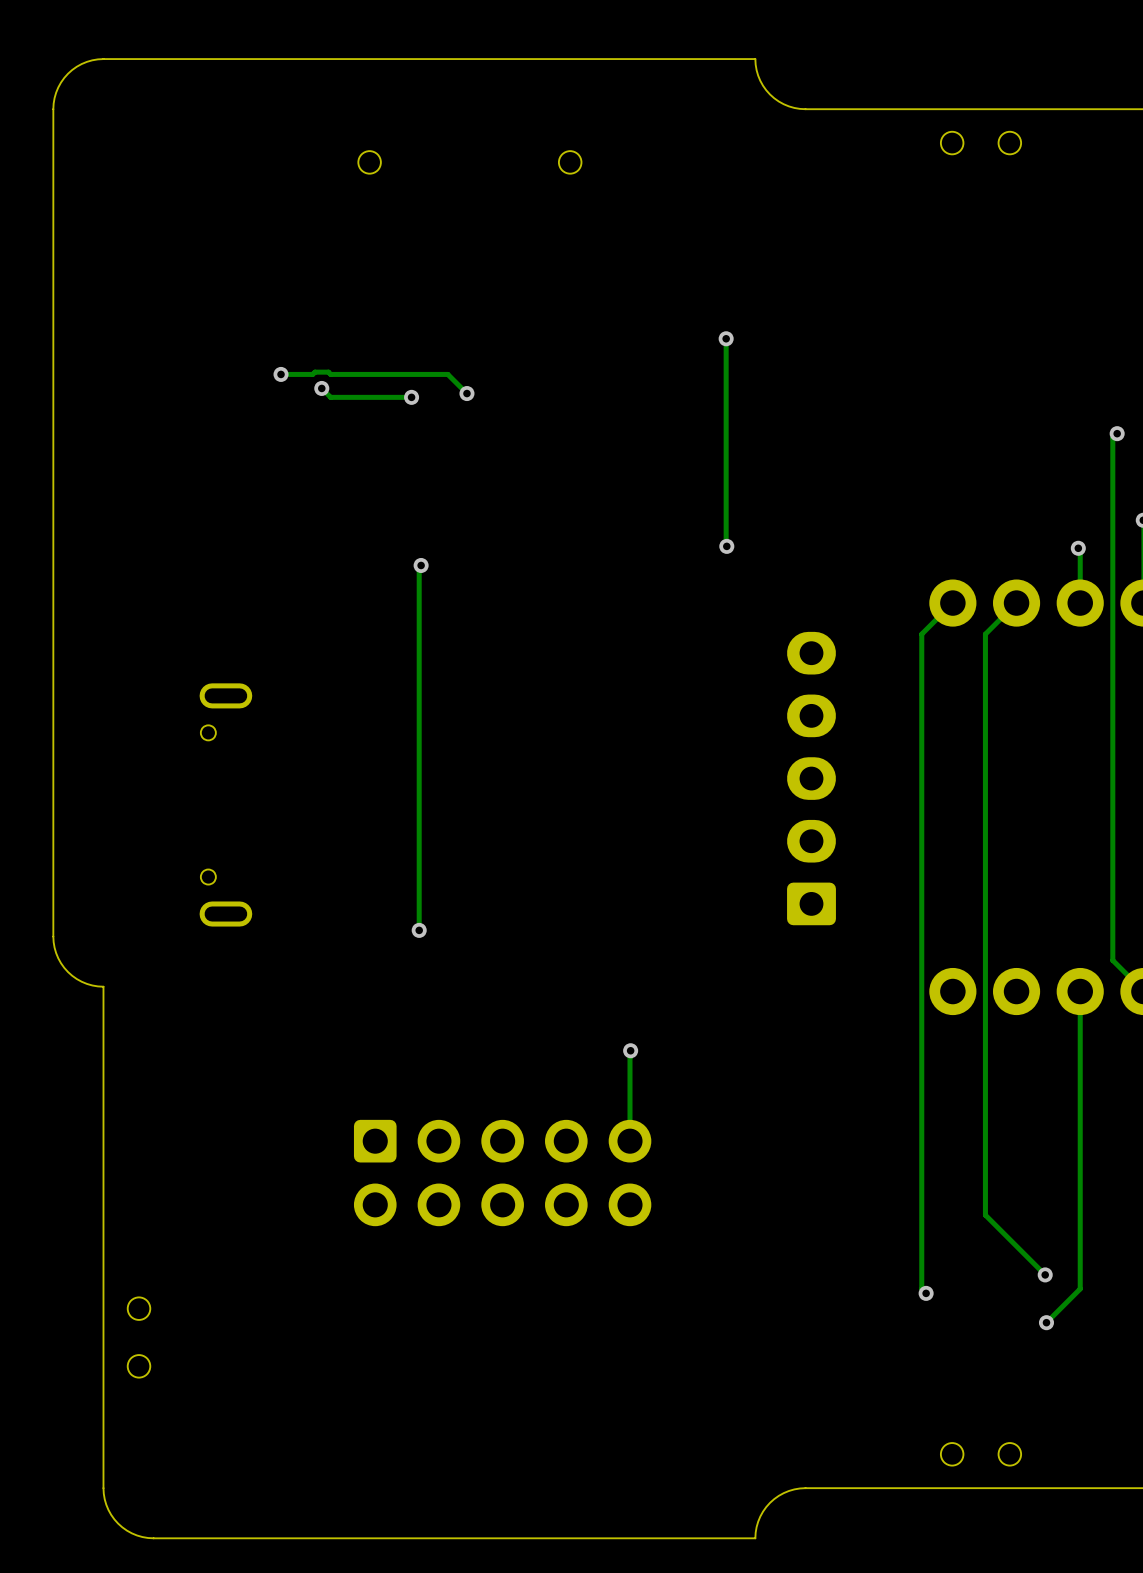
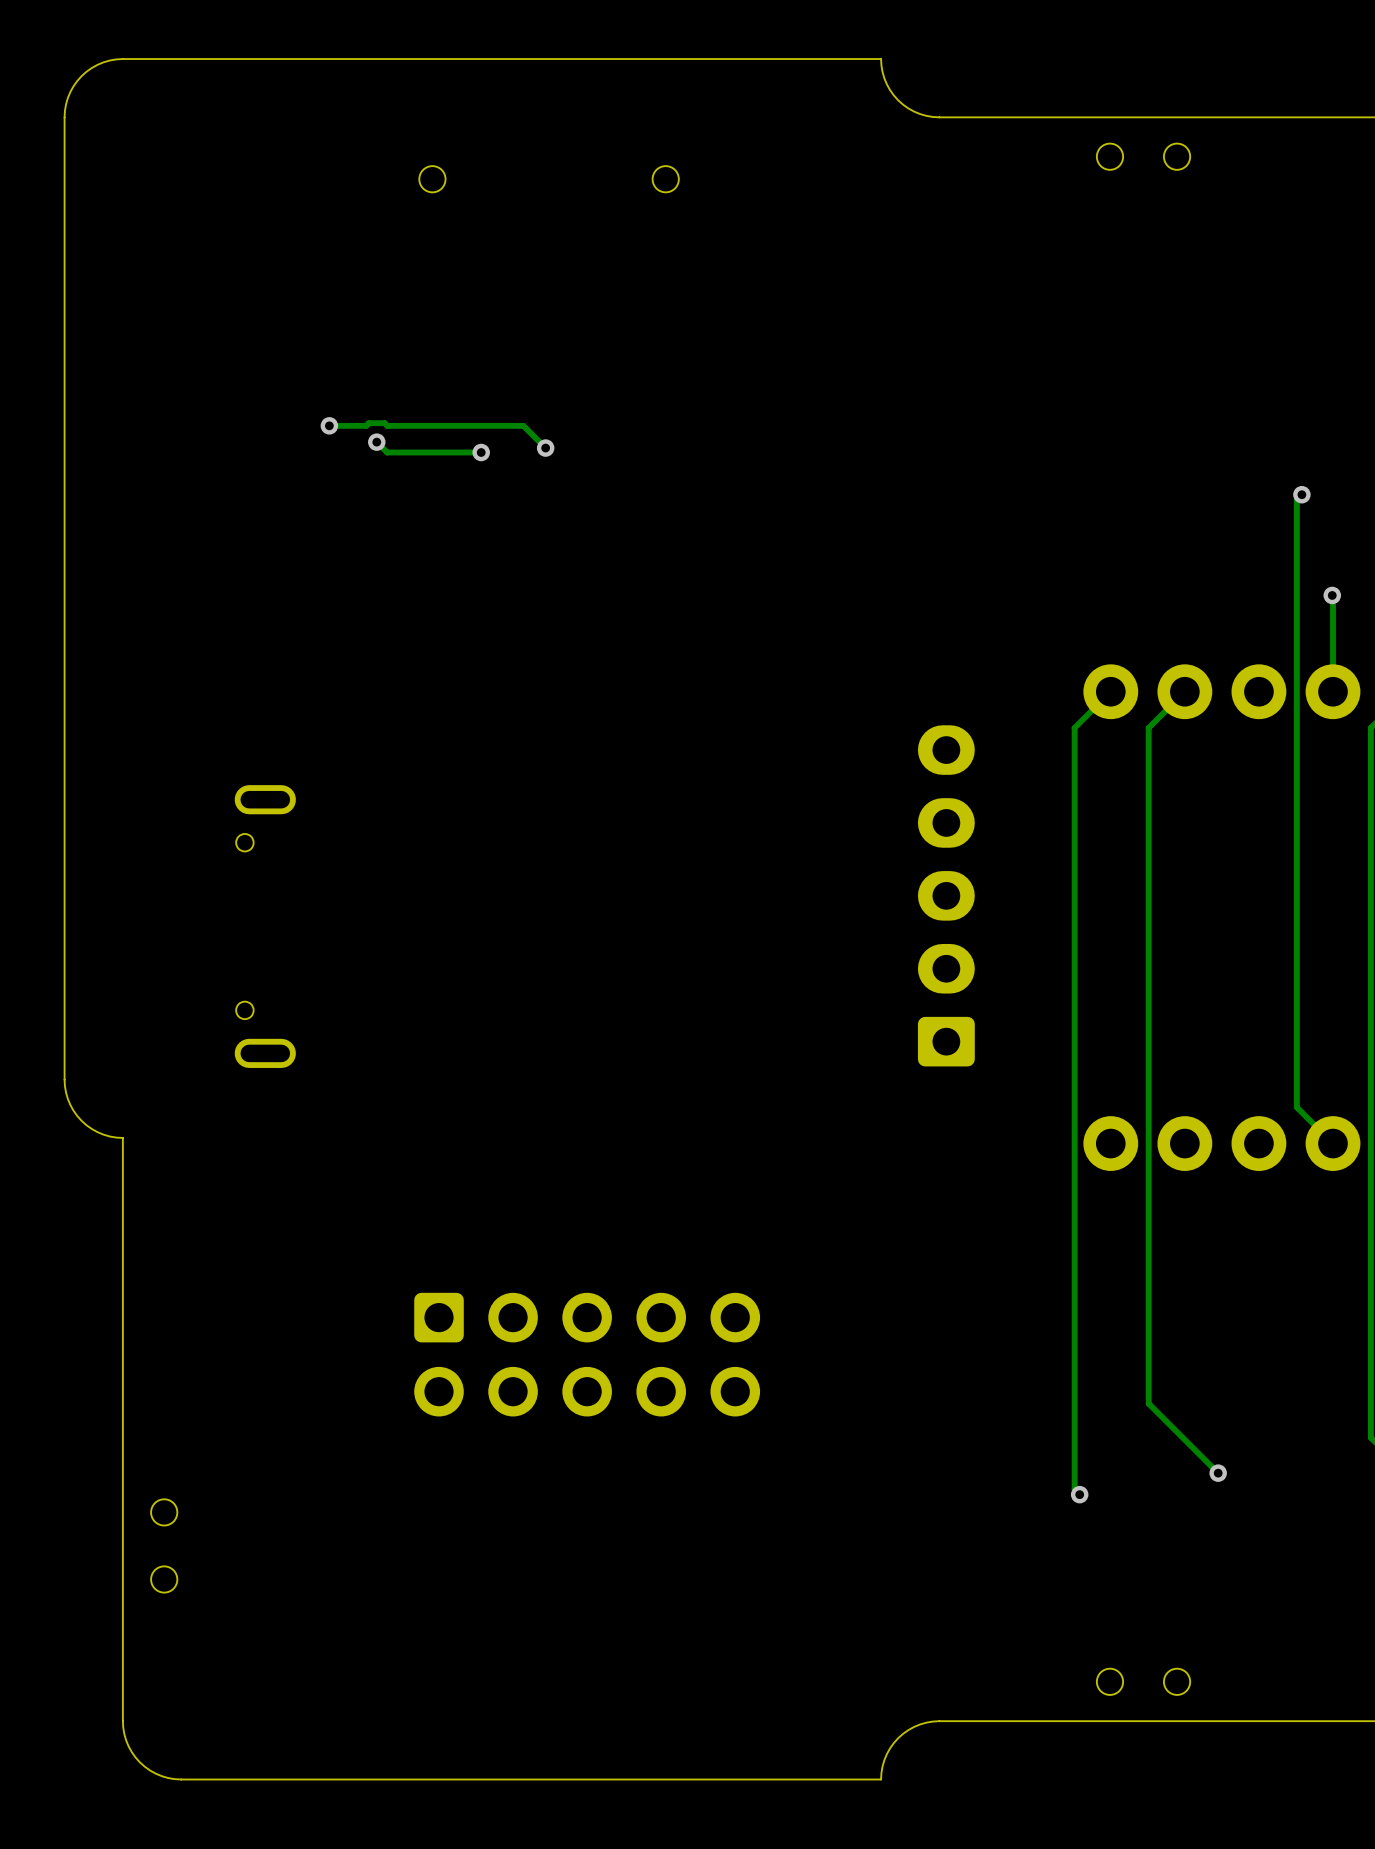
track: (726, 338) (726, 546) -> none
via: (726, 338) -> none
via: (726, 546) -> none
track: (1078, 548) (1080, 550) (1080, 603) -> none
via: (1078, 548) -> none
track: (421, 565) (419, 567) (419, 930) -> none
via: (421, 565) -> none
via: (419, 930) -> none
track: (1080, 991) (1080, 1288) (1046, 1322) -> none
track: (630, 1050) (630, 1141) -> none
via: (630, 1050) -> none
via: (1046, 1322) -> none

